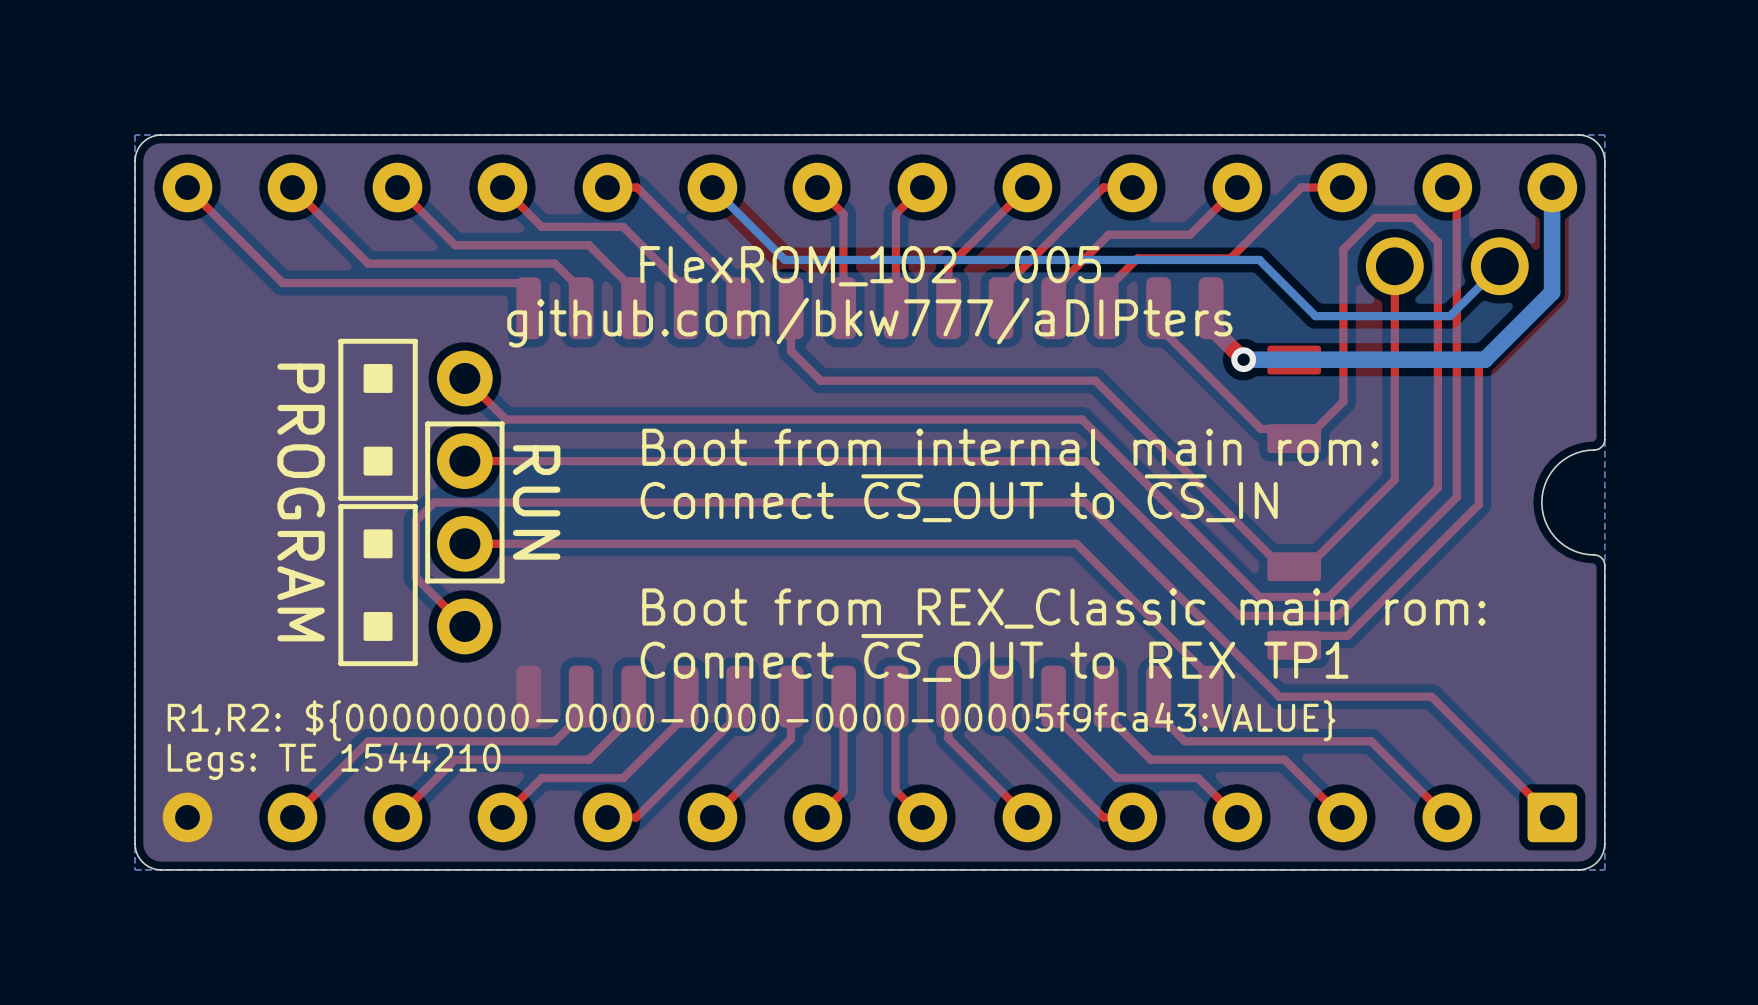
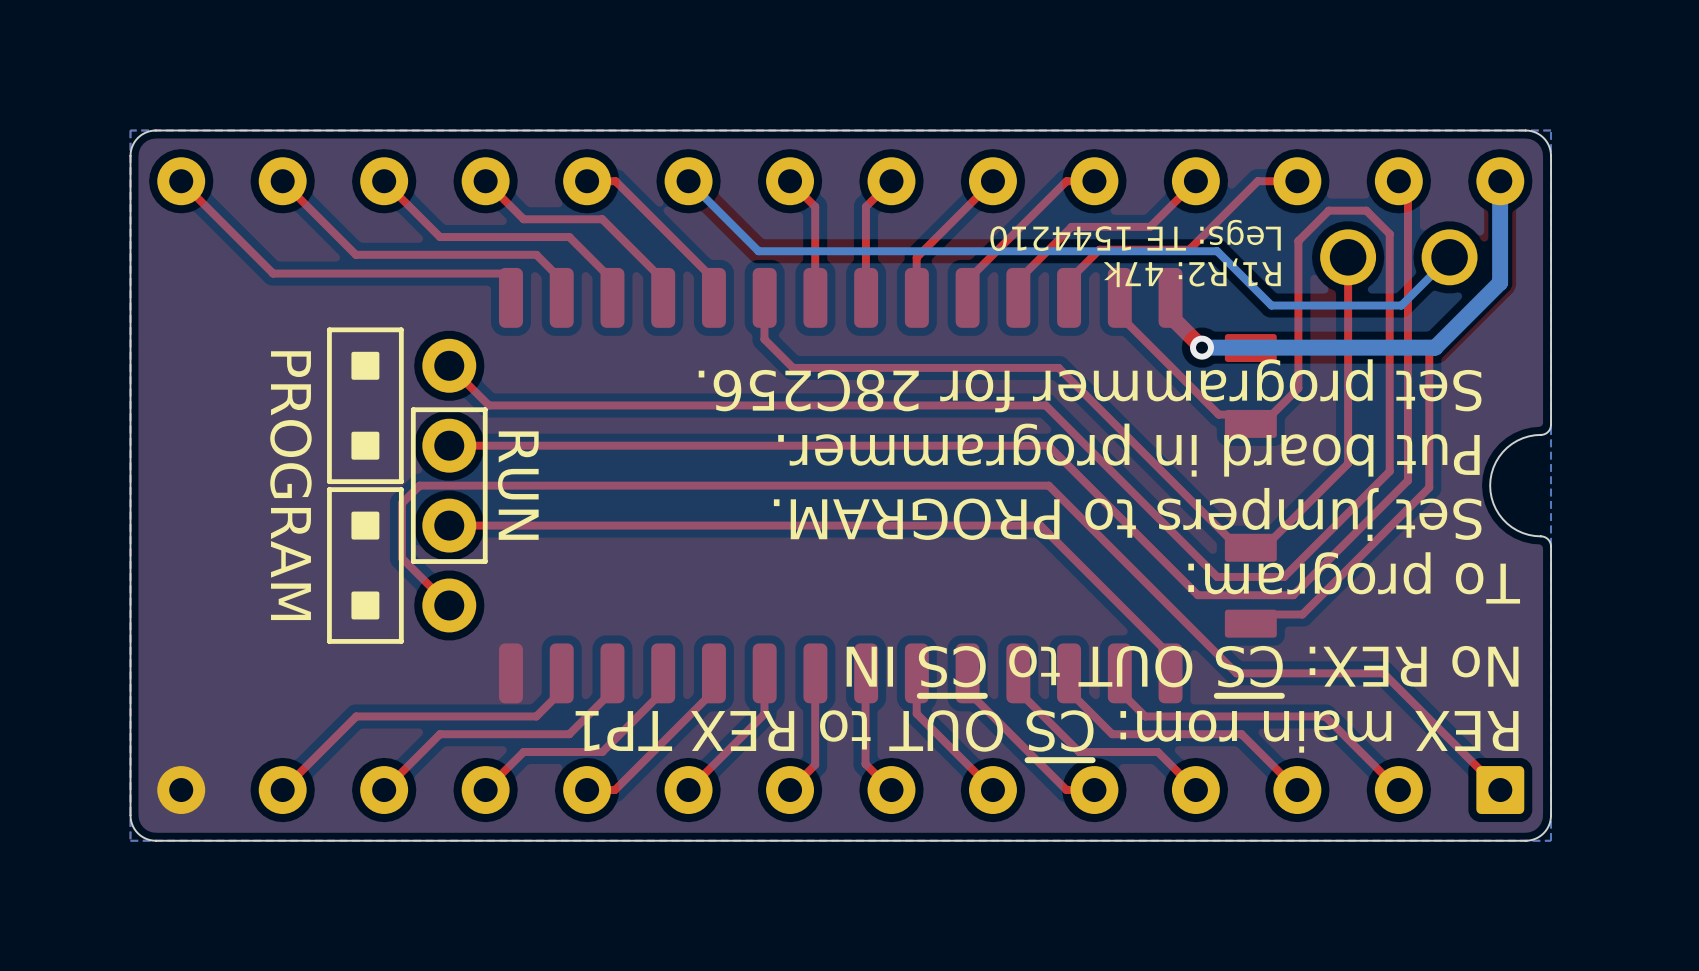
text: none -> Legs: TE 1544210 (1135, 235)
text: FlexROM_102 005 (870, 266) -> none
text: none -> R1,R2: 47k (1192, 272)
text: github.com/bkw777/aDIPters (869, 322) -> none
text: none -> Set programmer for 28C256. (1090, 385)
text: Boot from internal main rom: (1010, 447) -> none
text: none -> Put board in programmer. (1128, 450)
text: Connect ~{CS}_OUT to ~{CS}_IN (959, 498) -> none
text: none -> Set jumpers to PROGRAM. (1127, 514)
text: none -> To program: (1354, 577)
text: Boot from REX_Classic main rom: (1063, 608) -> none
text: Connect ~{CS}_OUT to REX TP1 (994, 657) -> none
text: none -> No REX: ~{CS} OUT to ~{CS} IN (1182, 670)
text: R1,R2: ${00000000-0000-0000-0000-00005f9fca43:VALUE} (751, 720) -> none
text: Legs: TE 1544210 (334, 761) -> none
text: none -> REX main rom: ~{CS} OUT to REX TP1 (1047, 735)

